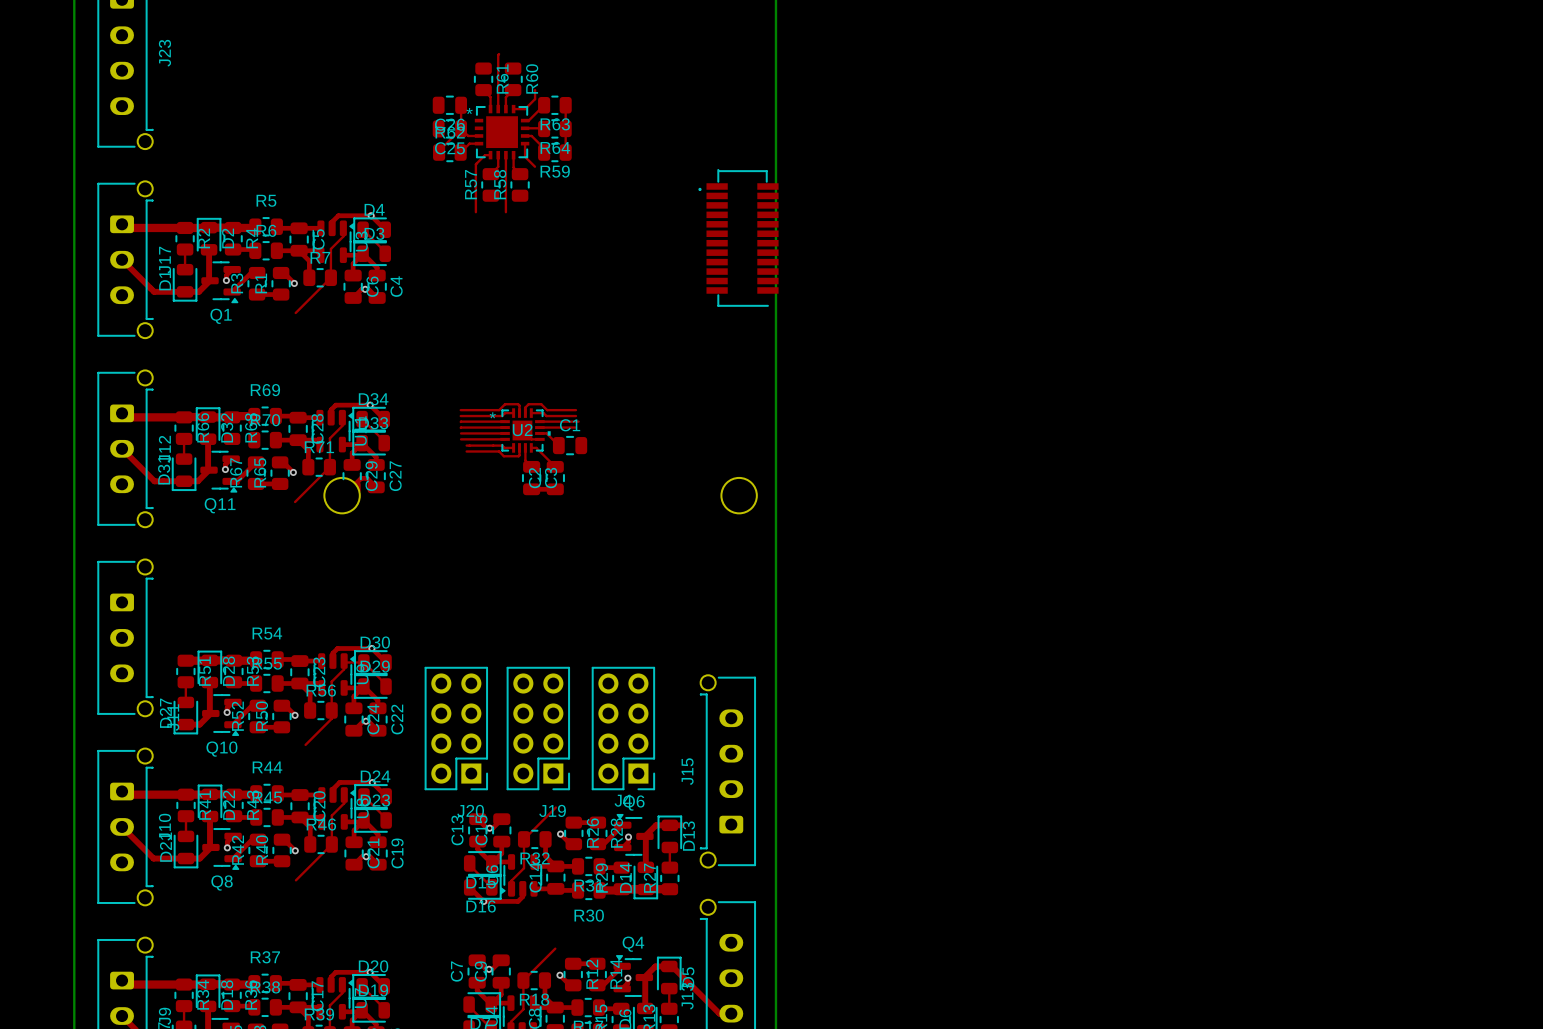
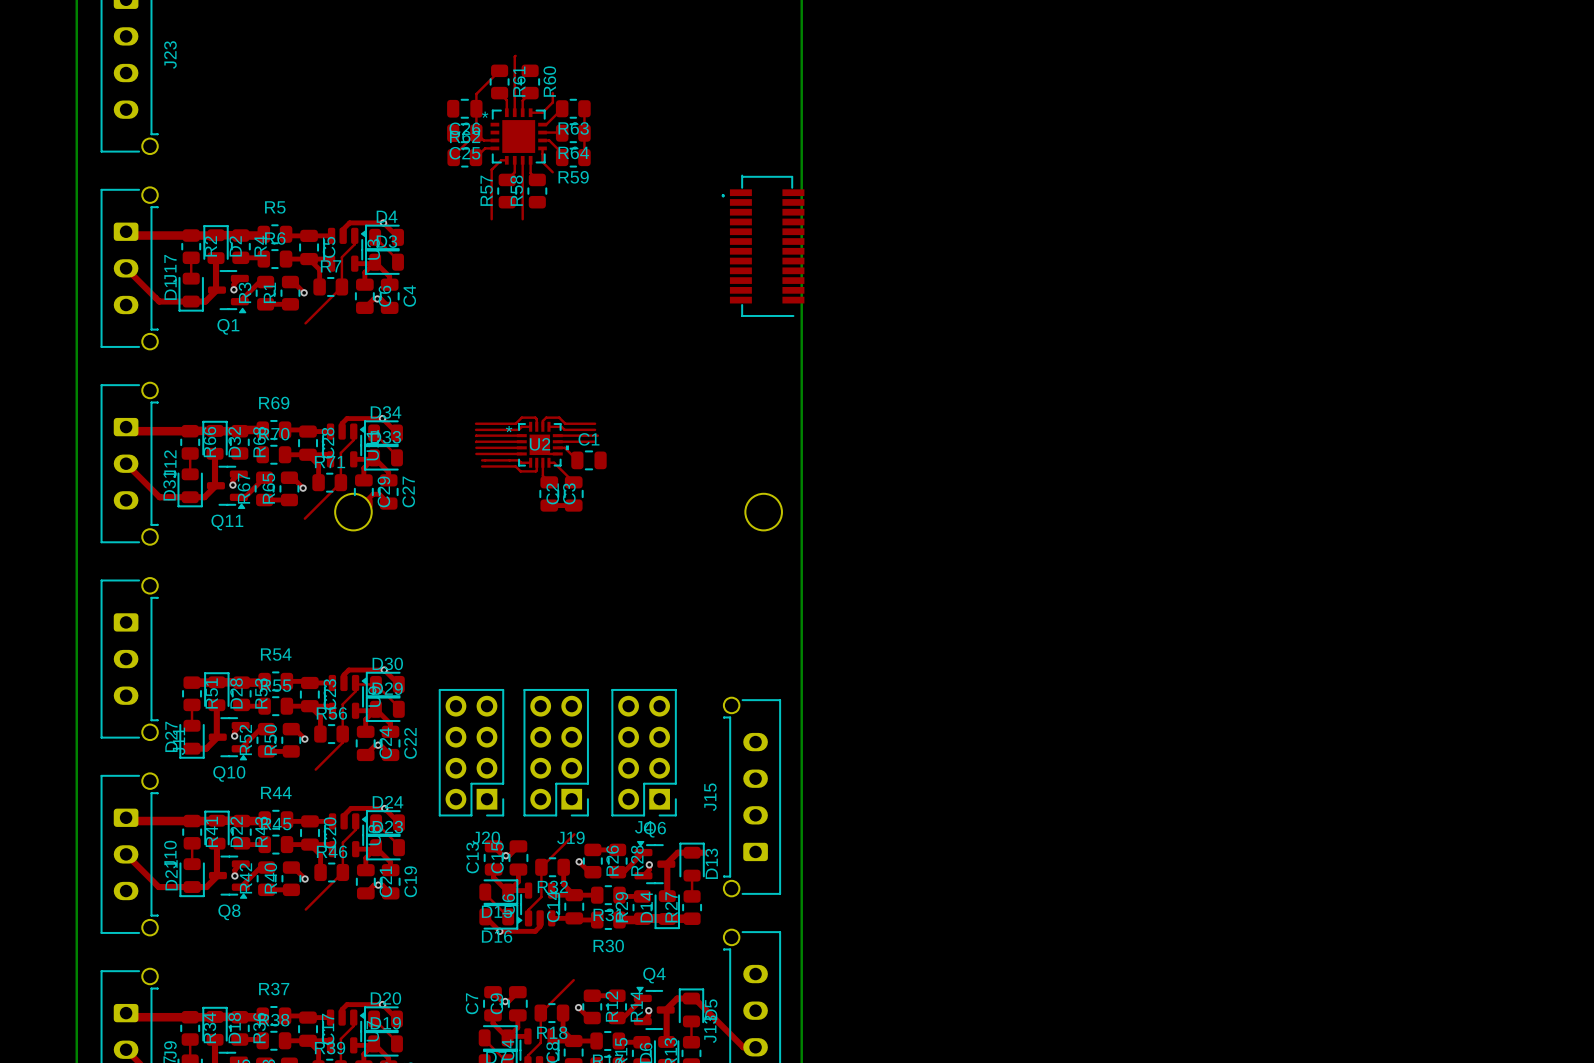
top track: none -> (499, 70) (476, 94) (476, 108)

